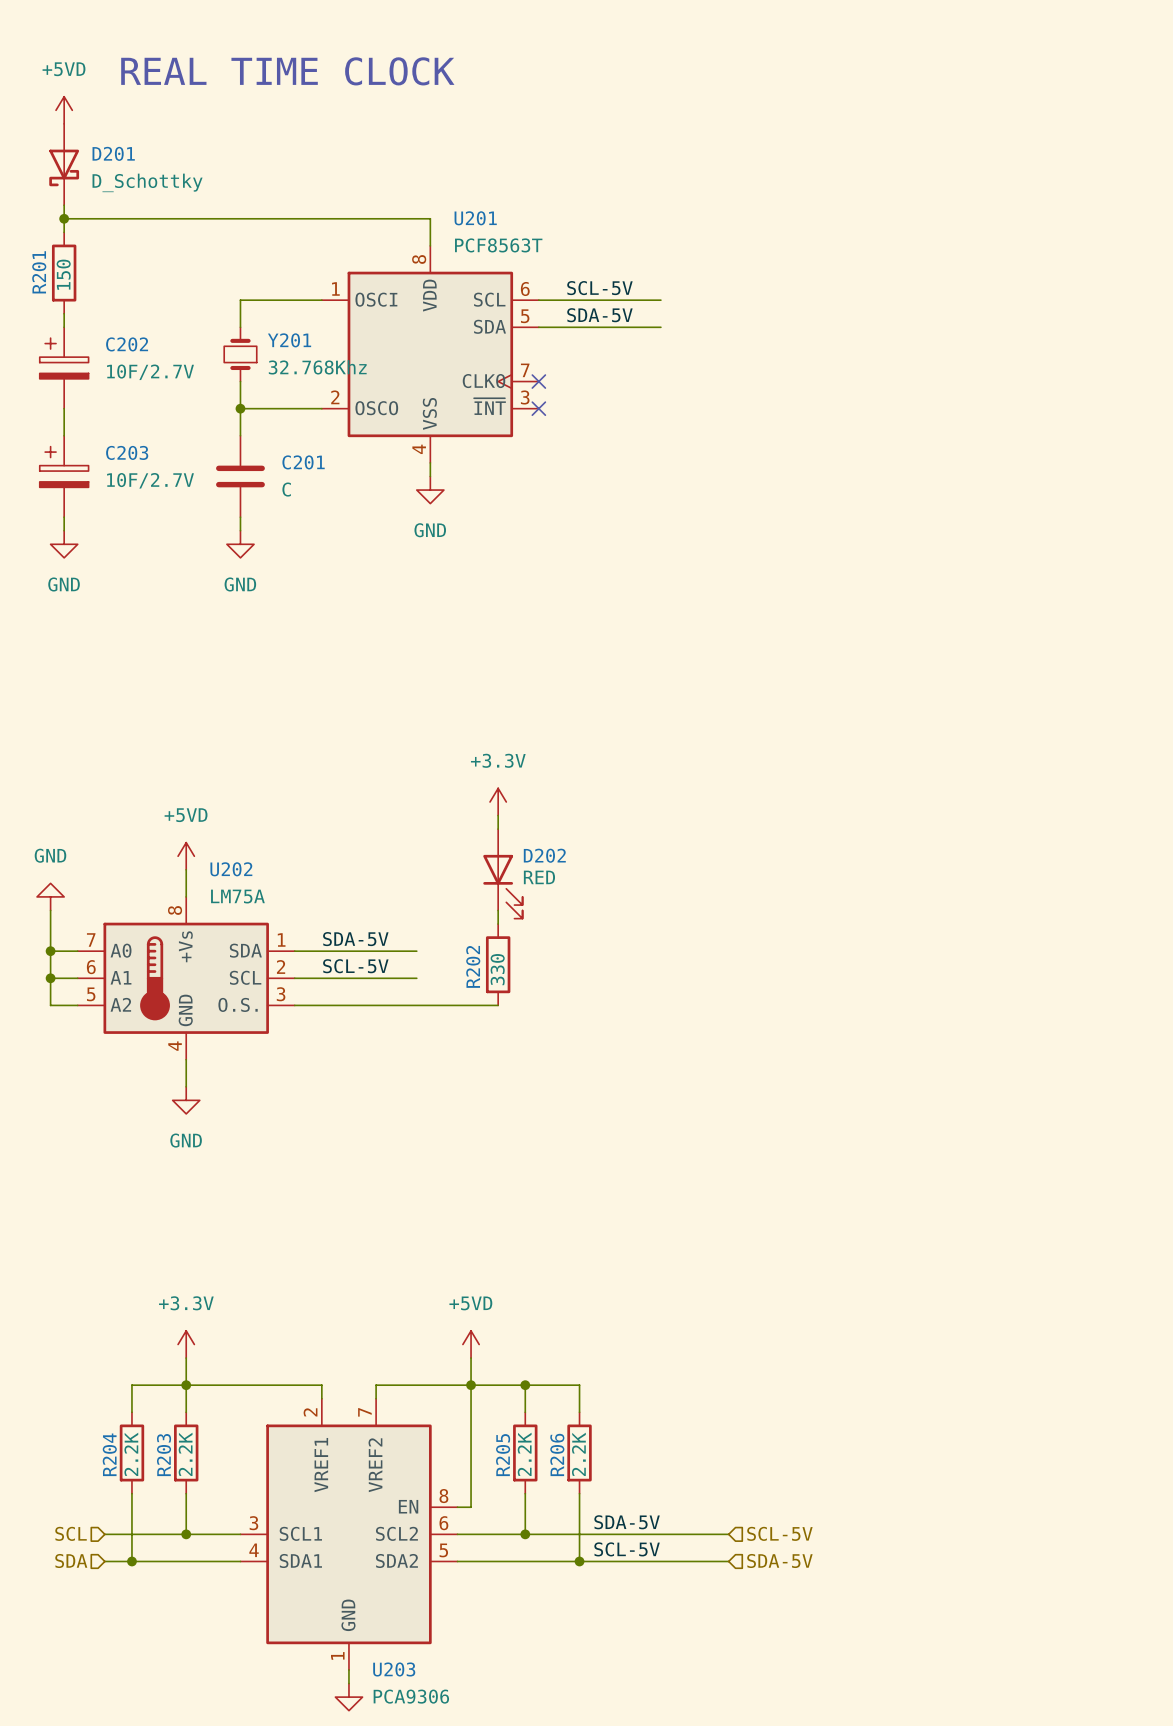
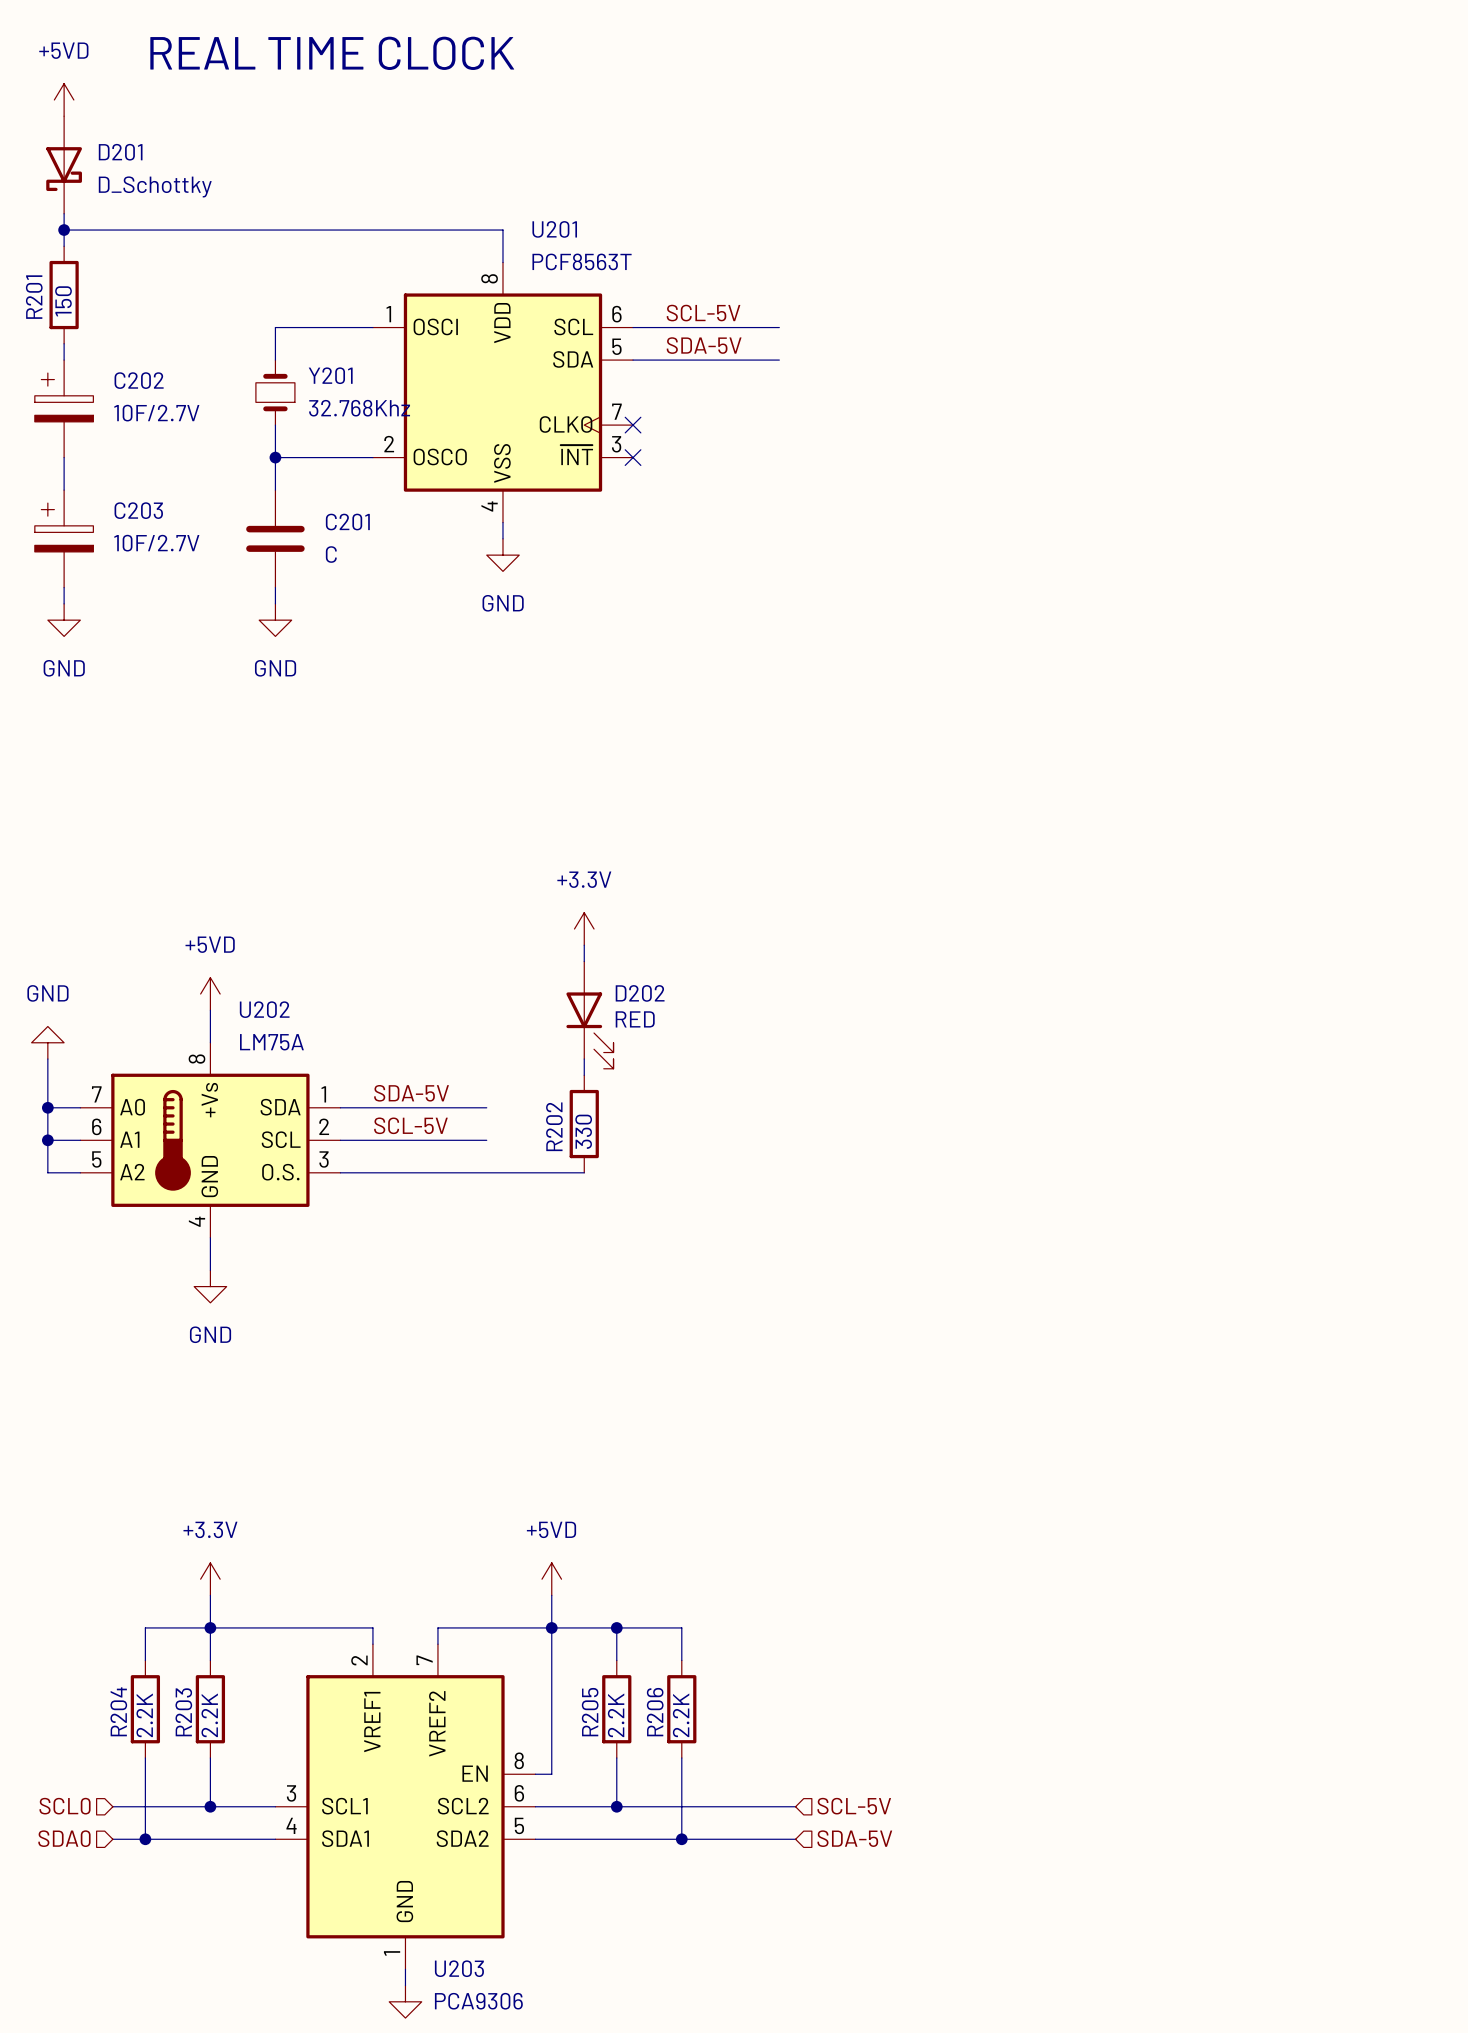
label: SDA-5V (627, 1522) -> none
hierarchical label: SCL (71, 1533) -> SCL0 (65, 1806)
hierarchical label position: SCL-5V (779, 1533) -> SCL-5V (854, 1806)
wire: (674, 1534) (728, 1534) -> none
label: SCL-5V (627, 1549) -> none
hierarchical label: SDA (71, 1560) -> SDA0 (64, 1838)
hierarchical label position: SDA-5V (779, 1560) -> SDA-5V (854, 1838)
wire: (674, 1561) (728, 1561) -> none

